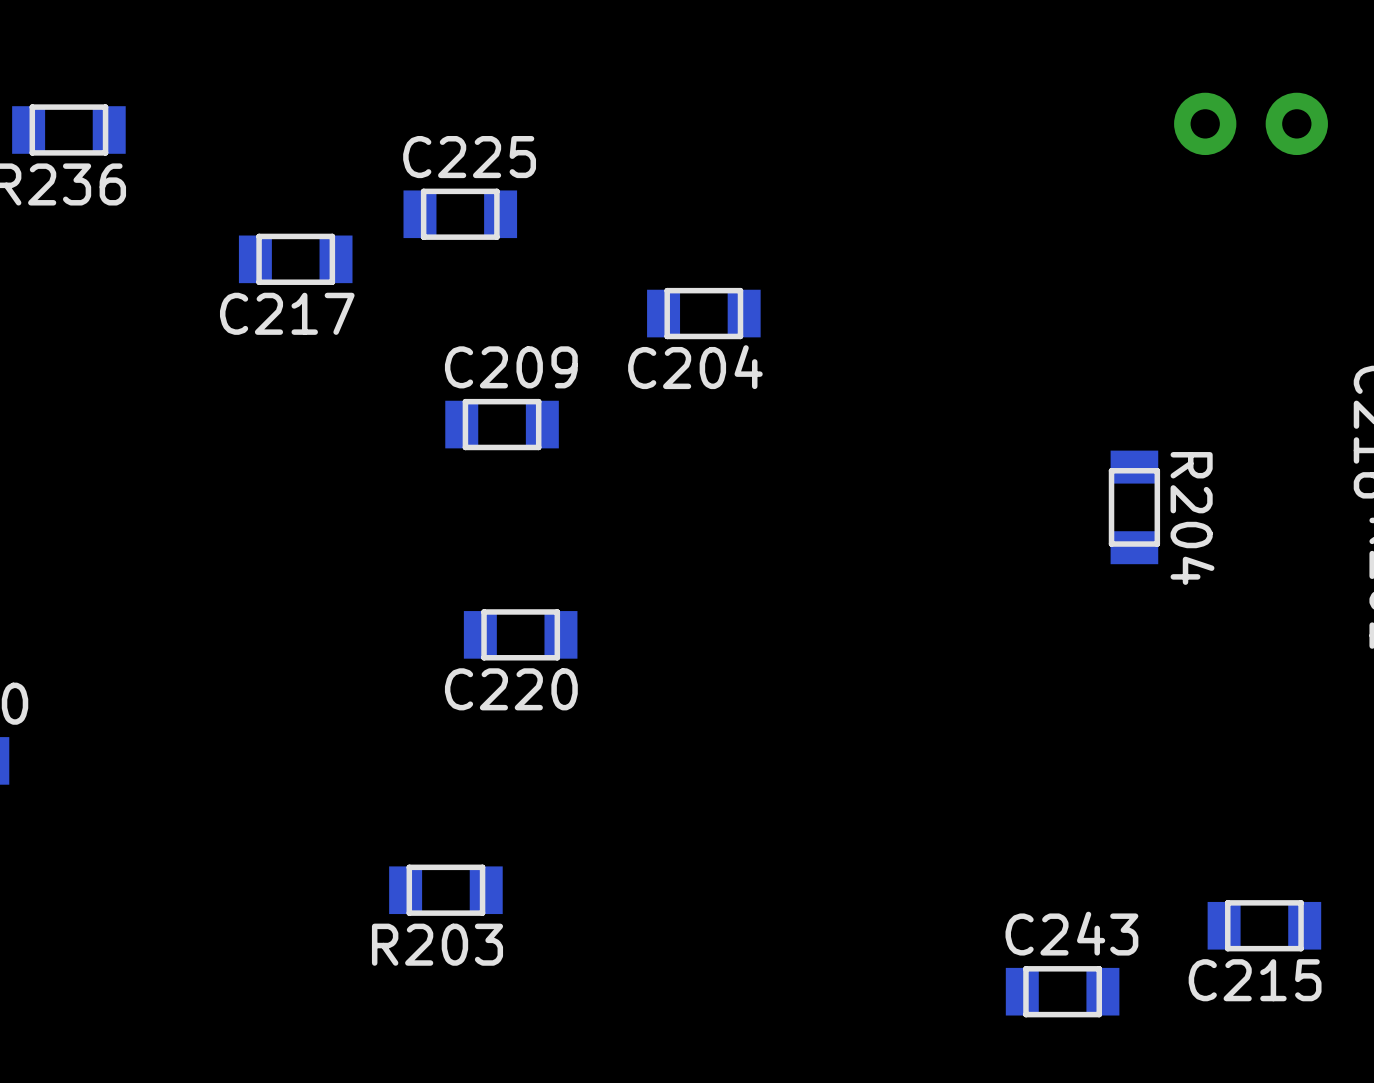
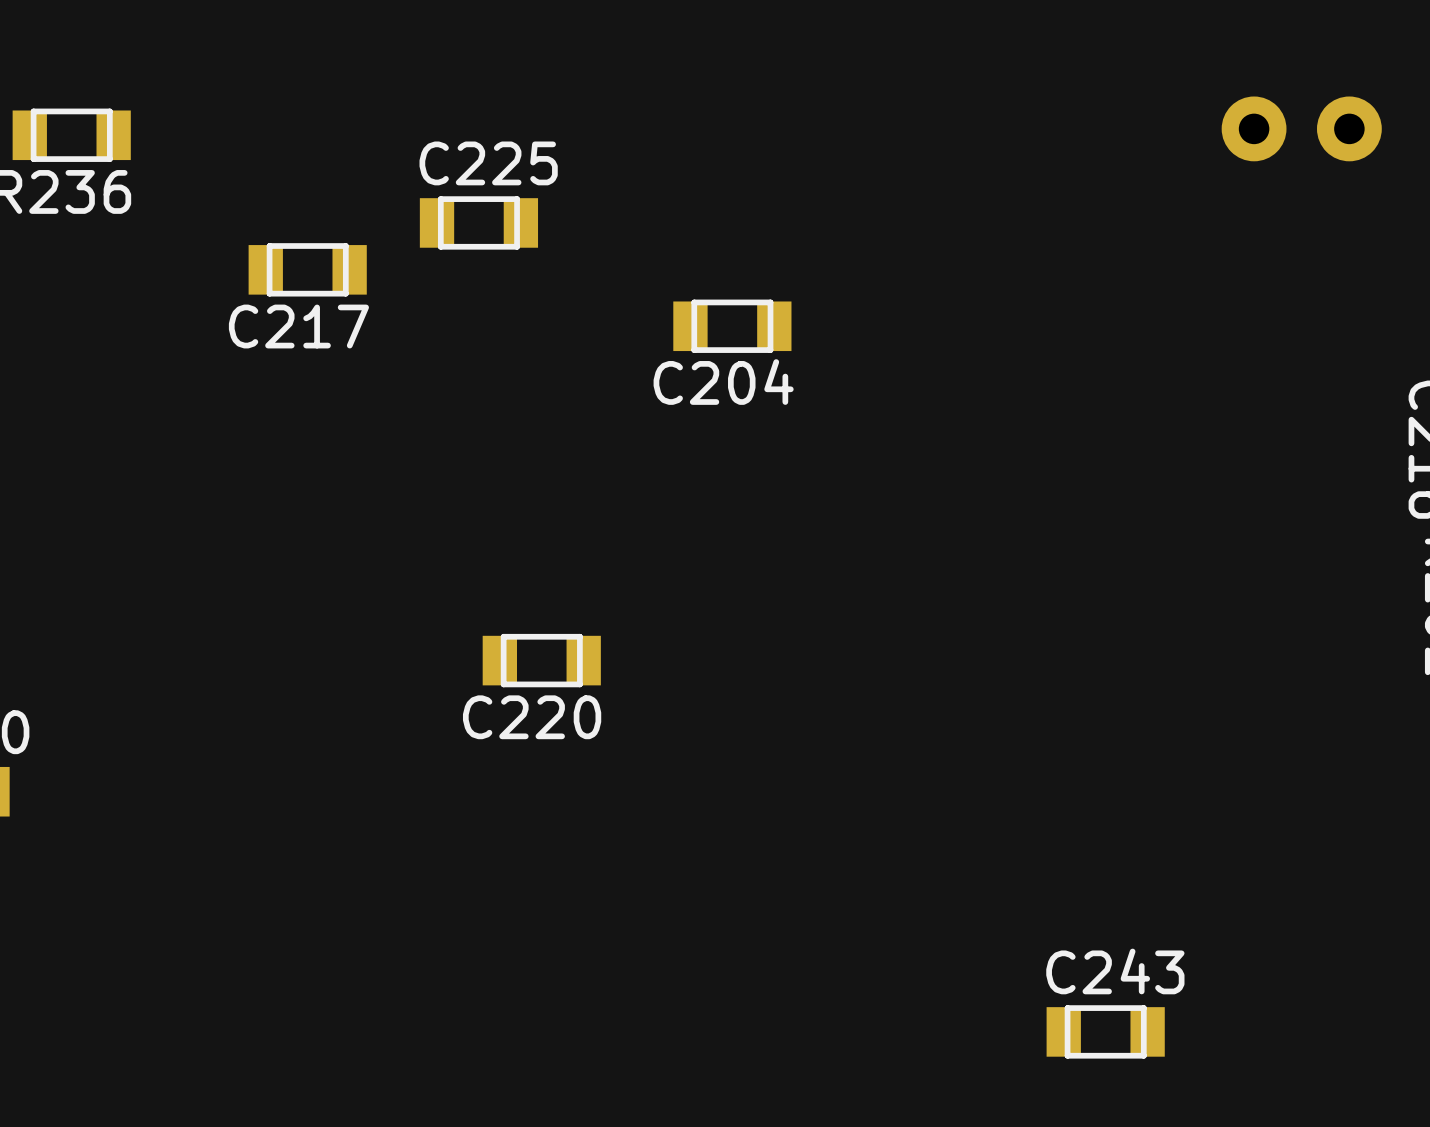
C209: (502, 424) -> none
R204: (1134, 507) -> none
R203: (445, 890) -> none
C215: (1264, 925) -> none

